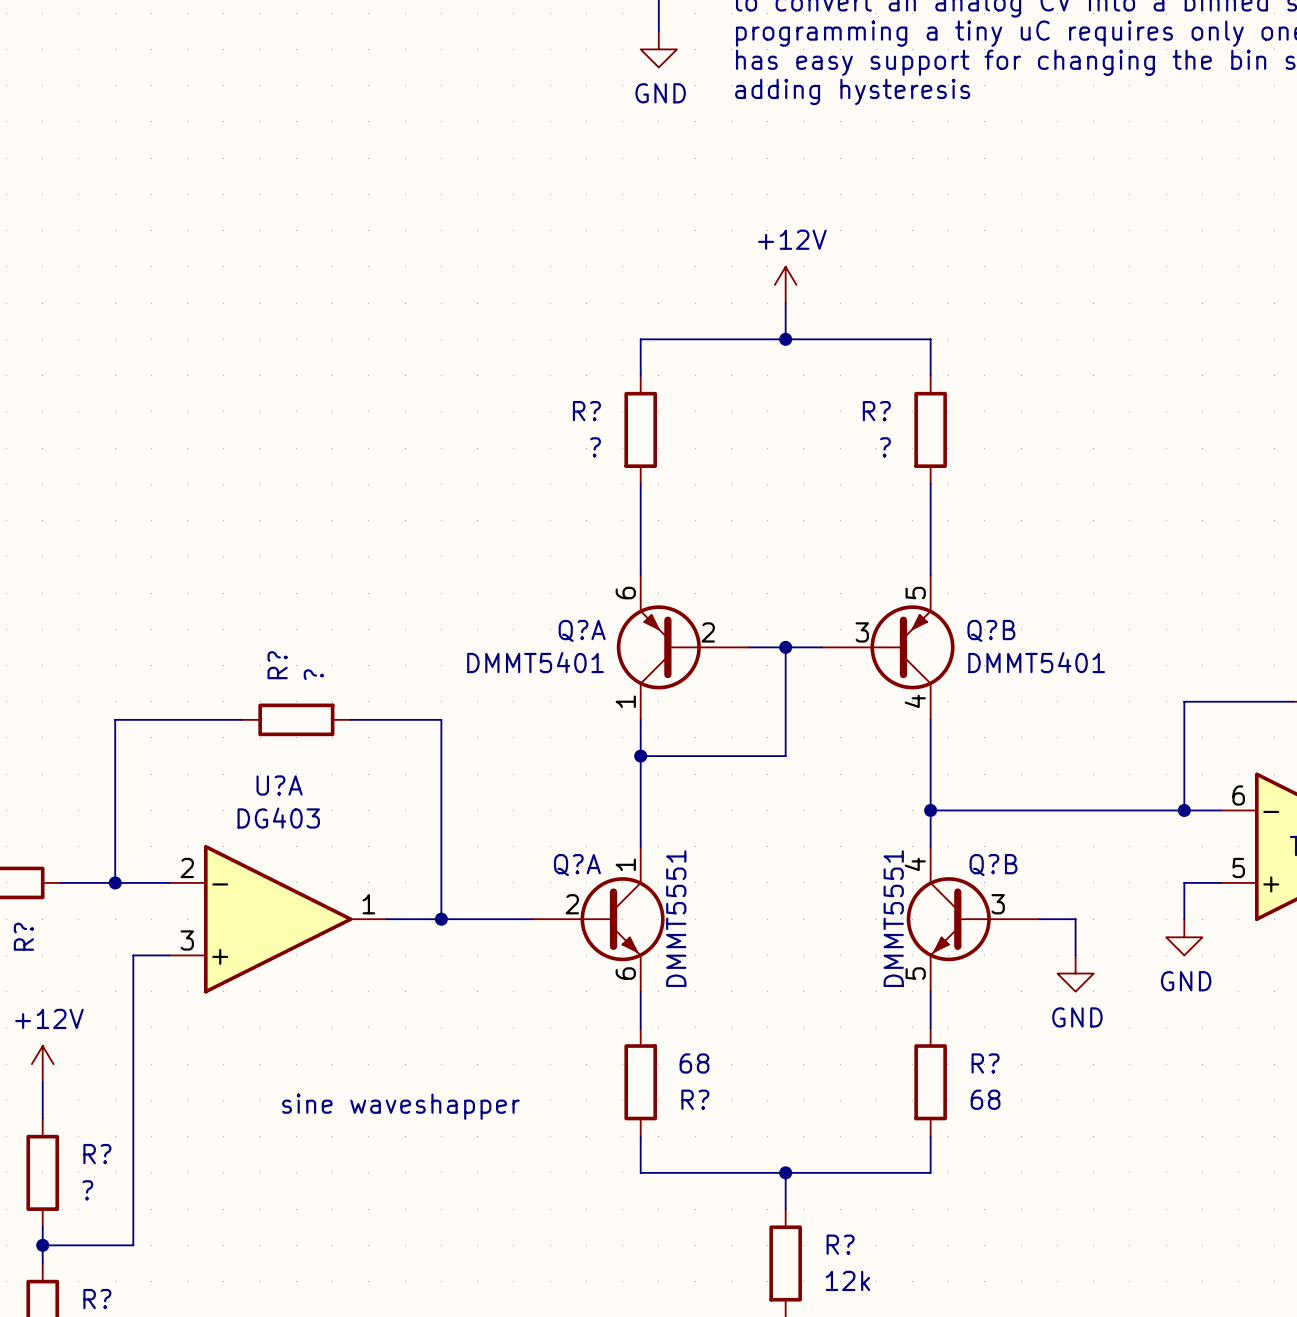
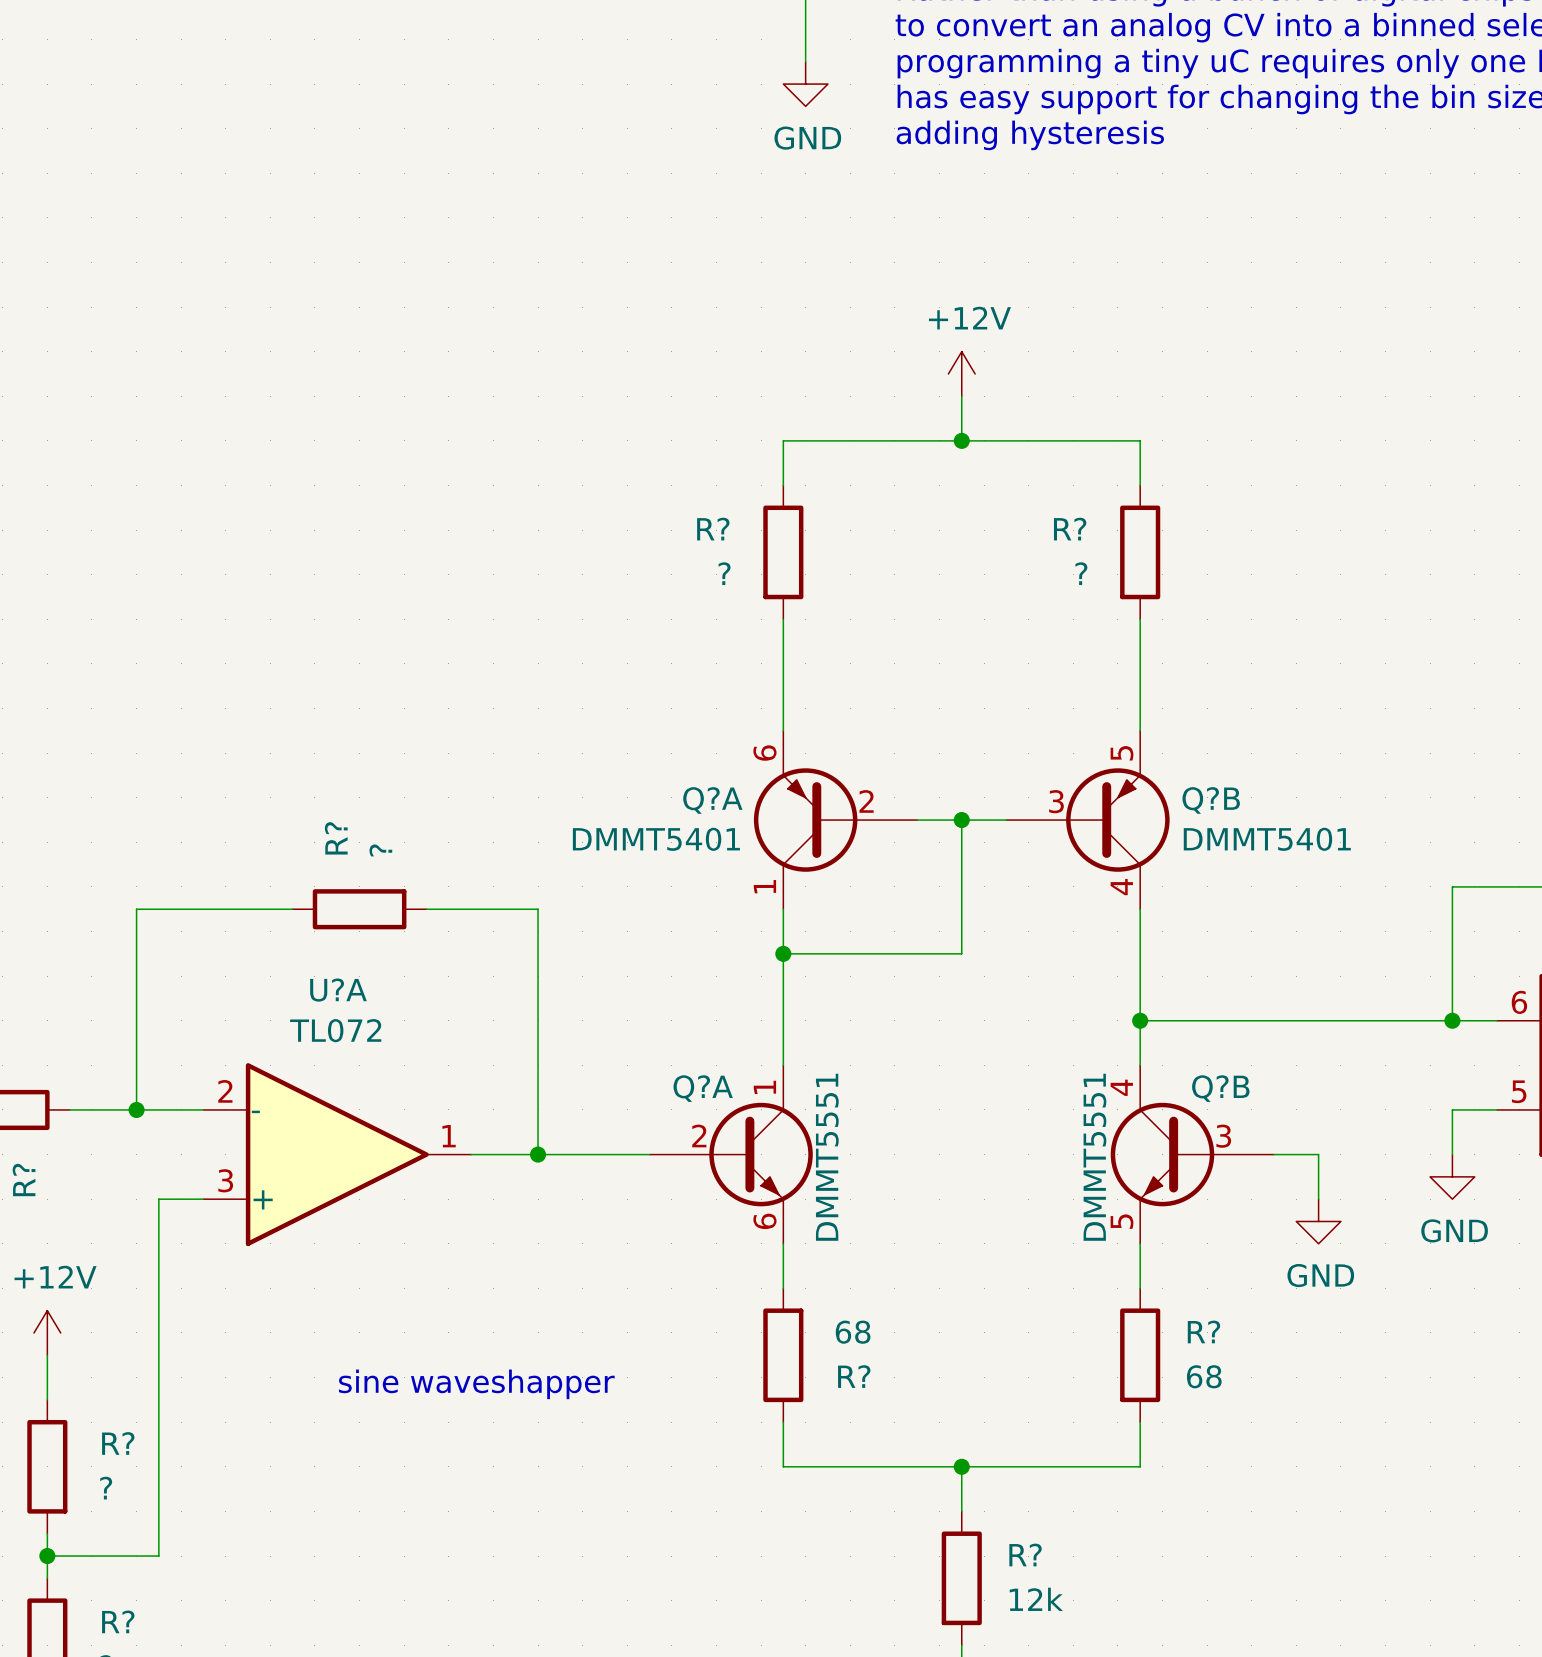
U?A value: DG403 (278, 818) -> TL072 (335, 1030)

